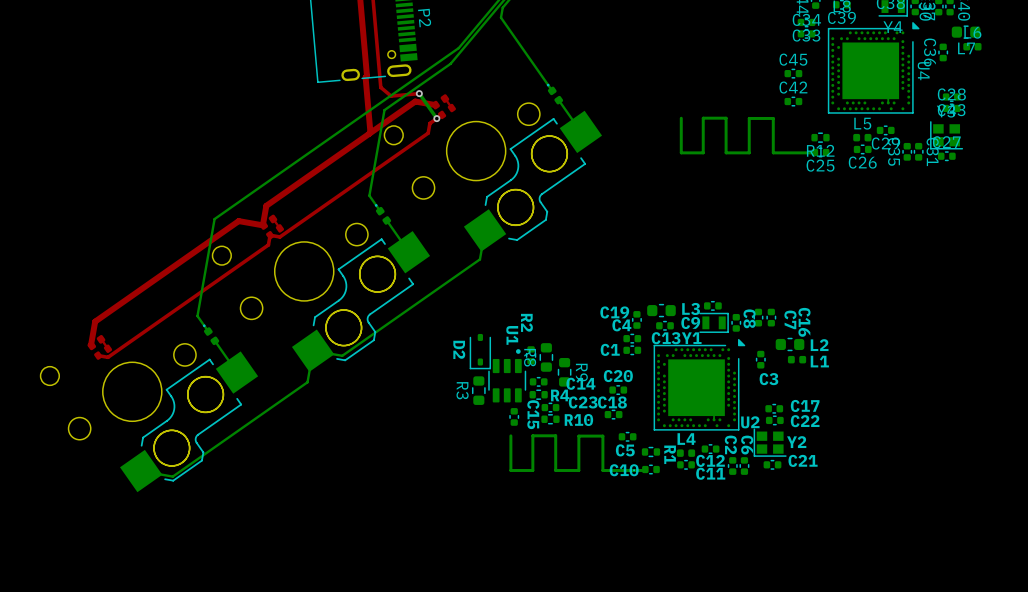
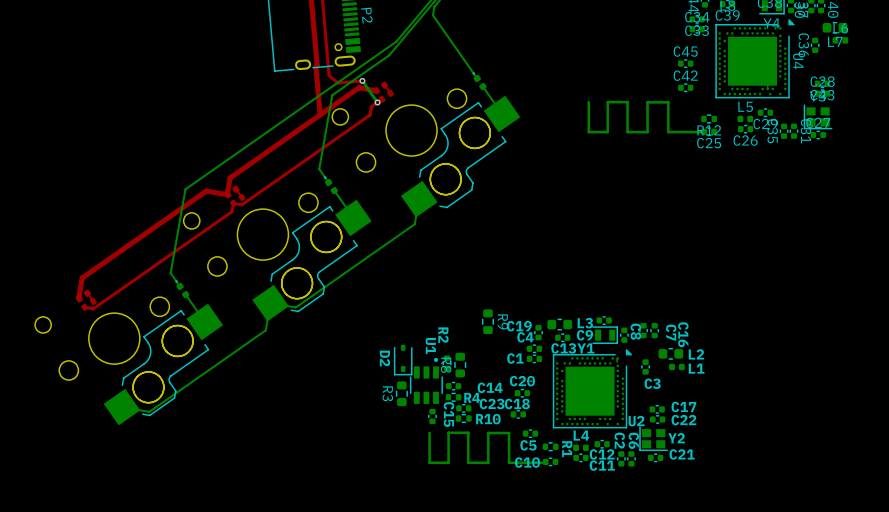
C9 position: (712, 305) -> (604, 320)
L3 position: (661, 310) -> (559, 324)
C7 position: (758, 317) -> (643, 330)
C16 position: (771, 317) -> (654, 330)
C19 position: (636, 319) -> (538, 332)
Y1 position: (714, 322) -> (605, 335)
C8 position: (736, 322) -> (624, 335)
C13 position: (664, 325) -> (562, 337)
C4 position: (632, 338) -> (534, 348)
L2 position: (790, 344) -> (670, 353)
C1 position: (632, 350) -> (534, 358)
D2 position: (480, 351) -> (403, 360)
R2 position: (531, 355) -> (447, 363)
R8 position: (546, 357) -> (460, 365)
C3 position: (760, 359) -> (645, 366)
L1 position: (797, 359) -> (676, 366)
U1 position: (507, 375) -> (426, 380)
C14 position: (538, 381) -> (453, 386)
U2 position: (699, 384) -> (592, 388)
R3 position: (478, 390) -> (401, 393)
C20 position: (618, 390) -> (522, 393)
R4 position: (538, 394) -> (453, 397)
C23 position: (550, 407) -> (463, 408)
C17 position: (774, 408) -> (657, 409)
C18 position: (613, 414) -> (518, 414)
C15 position: (514, 416) -> (432, 416)
R10 position: (550, 419) -> (463, 418)
C22 position: (774, 420) -> (657, 419)
C5 position: (627, 436) -> (530, 433)
Y2 position: (770, 442) -> (653, 438)
C12 position: (710, 449) -> (602, 444)
R1 position: (650, 451) -> (550, 446)
part position: (577, 453) -> (487, 447)
L4 position: (686, 453) -> (580, 447)
C11 position: (686, 464) -> (580, 457)
C21 position: (772, 464) -> (655, 457)
C2 position: (732, 466) -> (621, 458)
C6 position: (744, 466) -> (631, 458)
C10 position: (650, 469) -> (550, 461)

